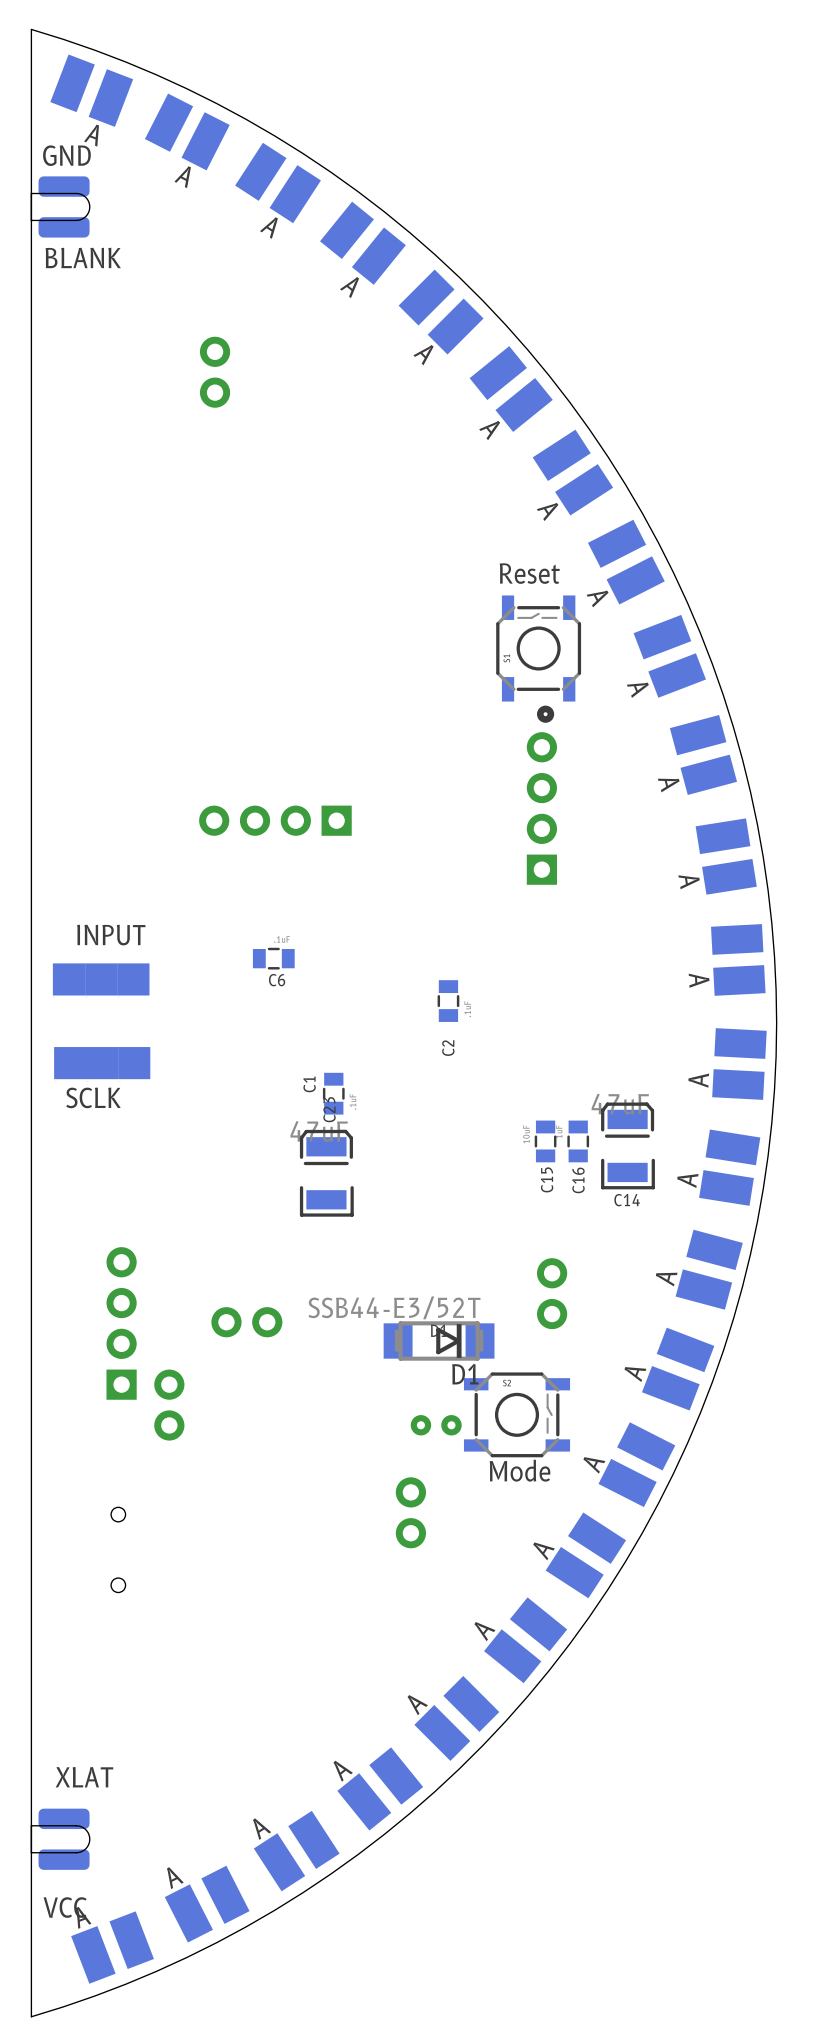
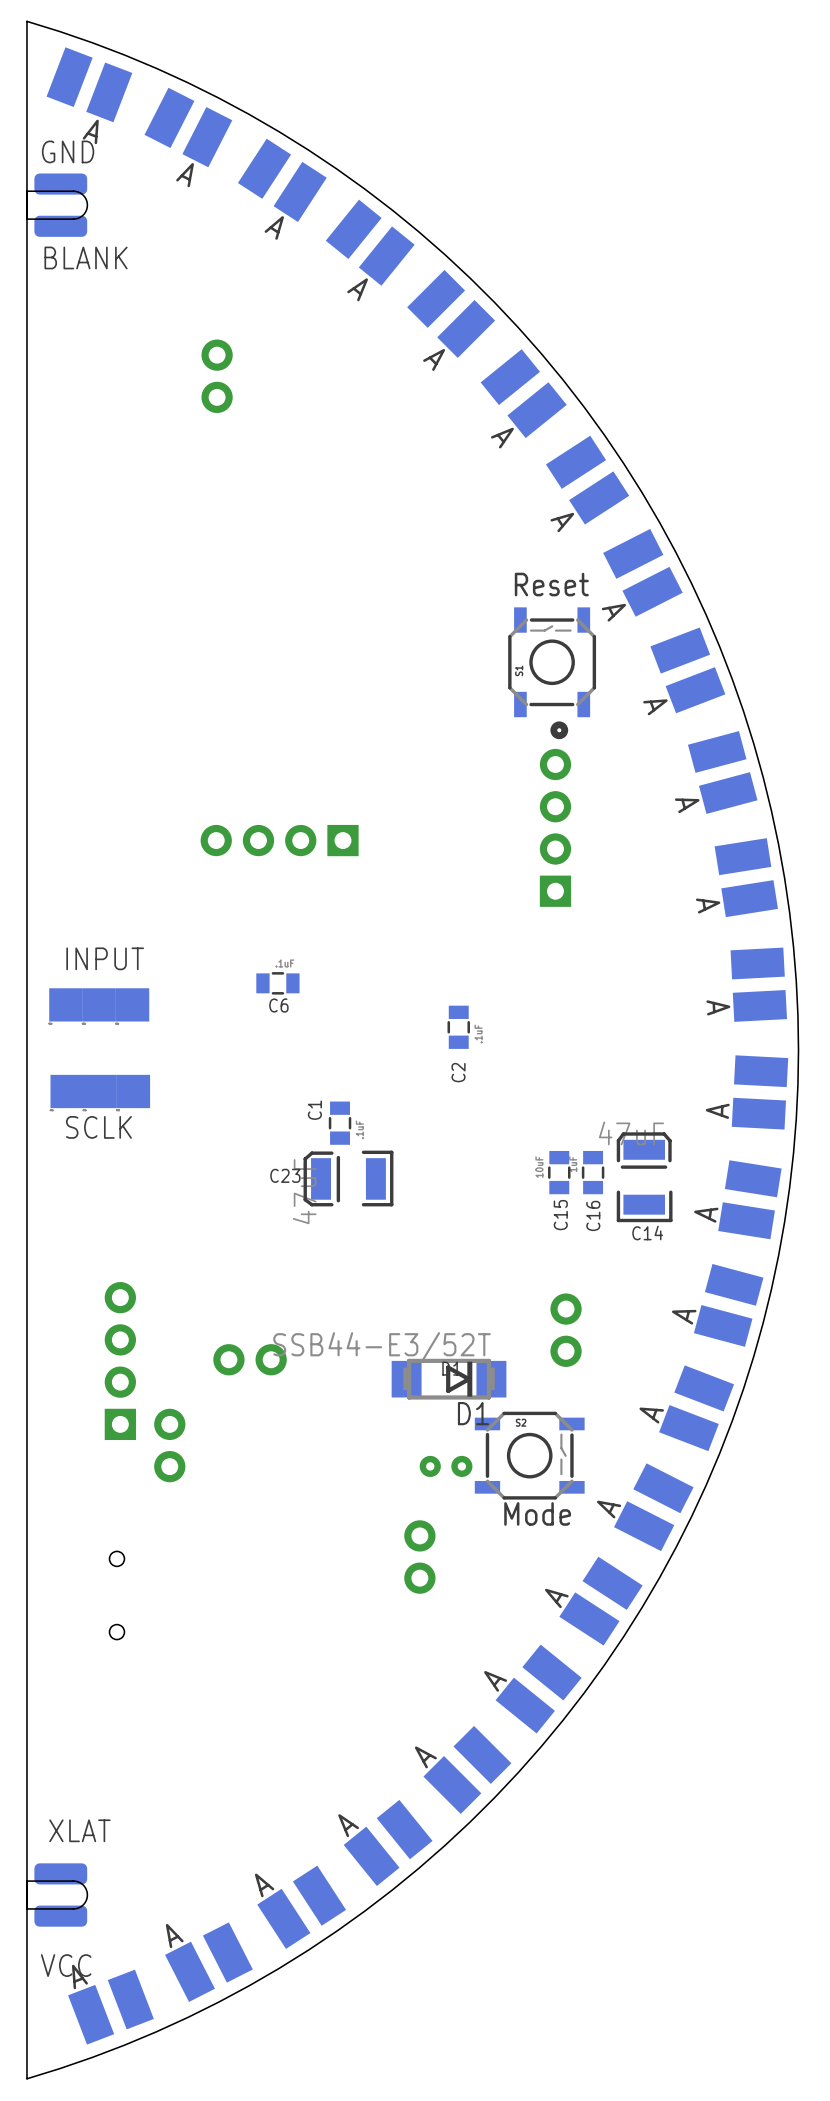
C23 rotation: 0° (326, 1173) -> 90° counterclockwise (348, 1178)

